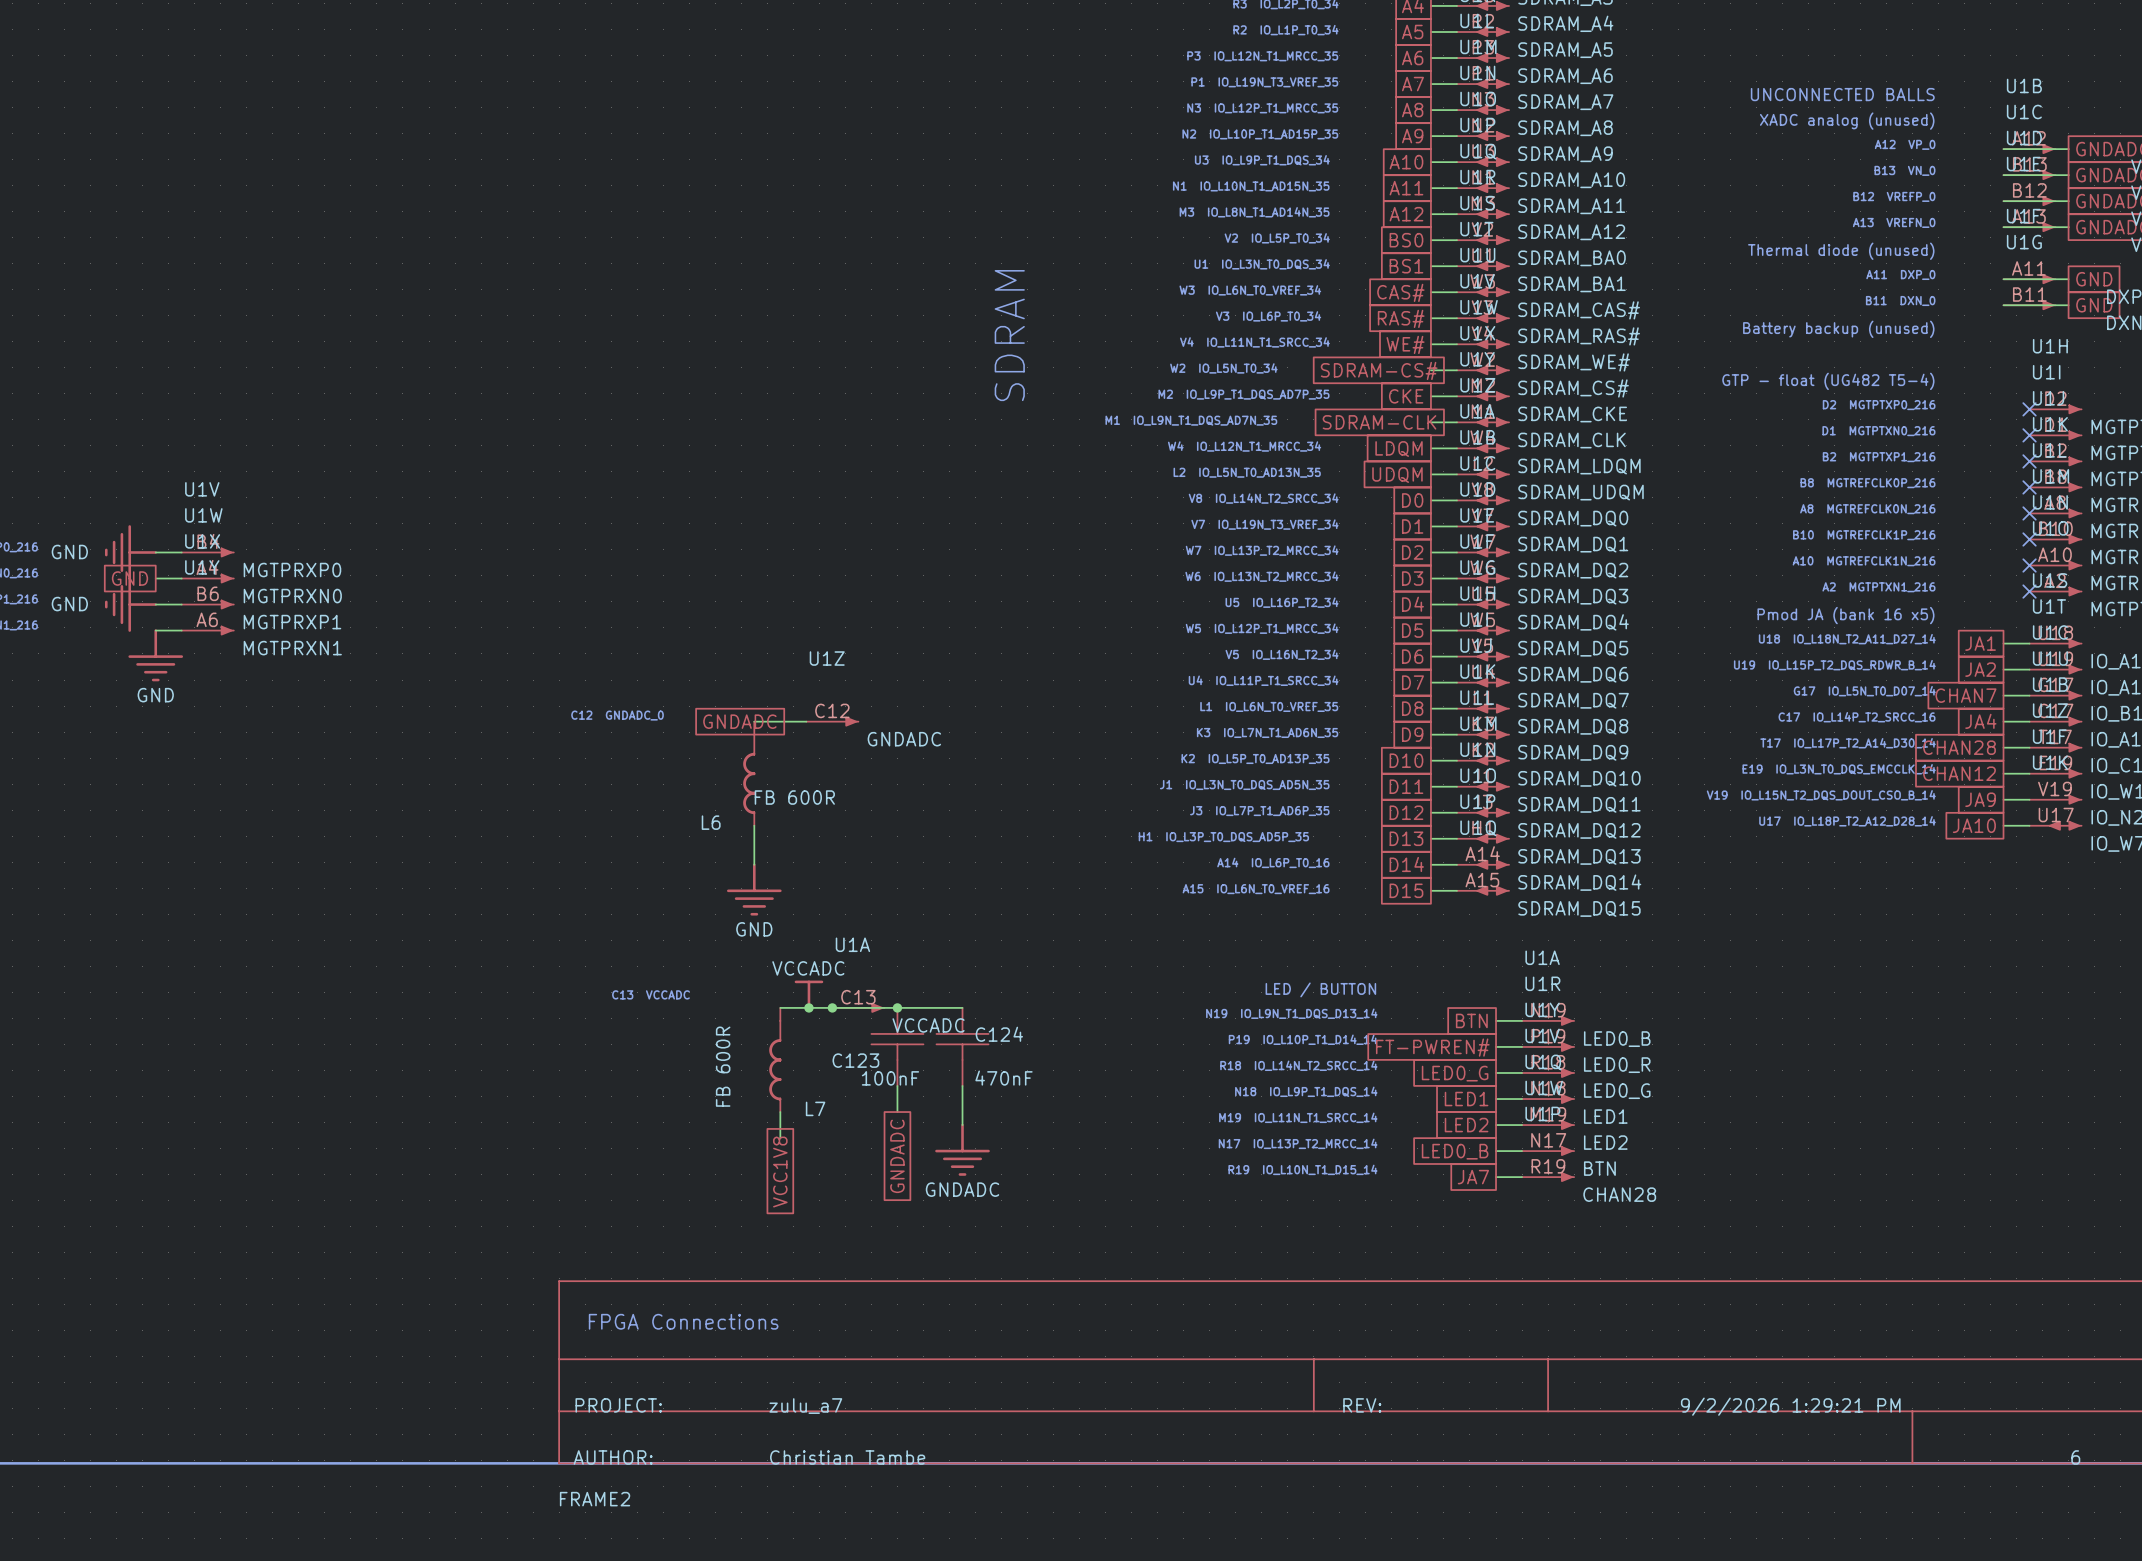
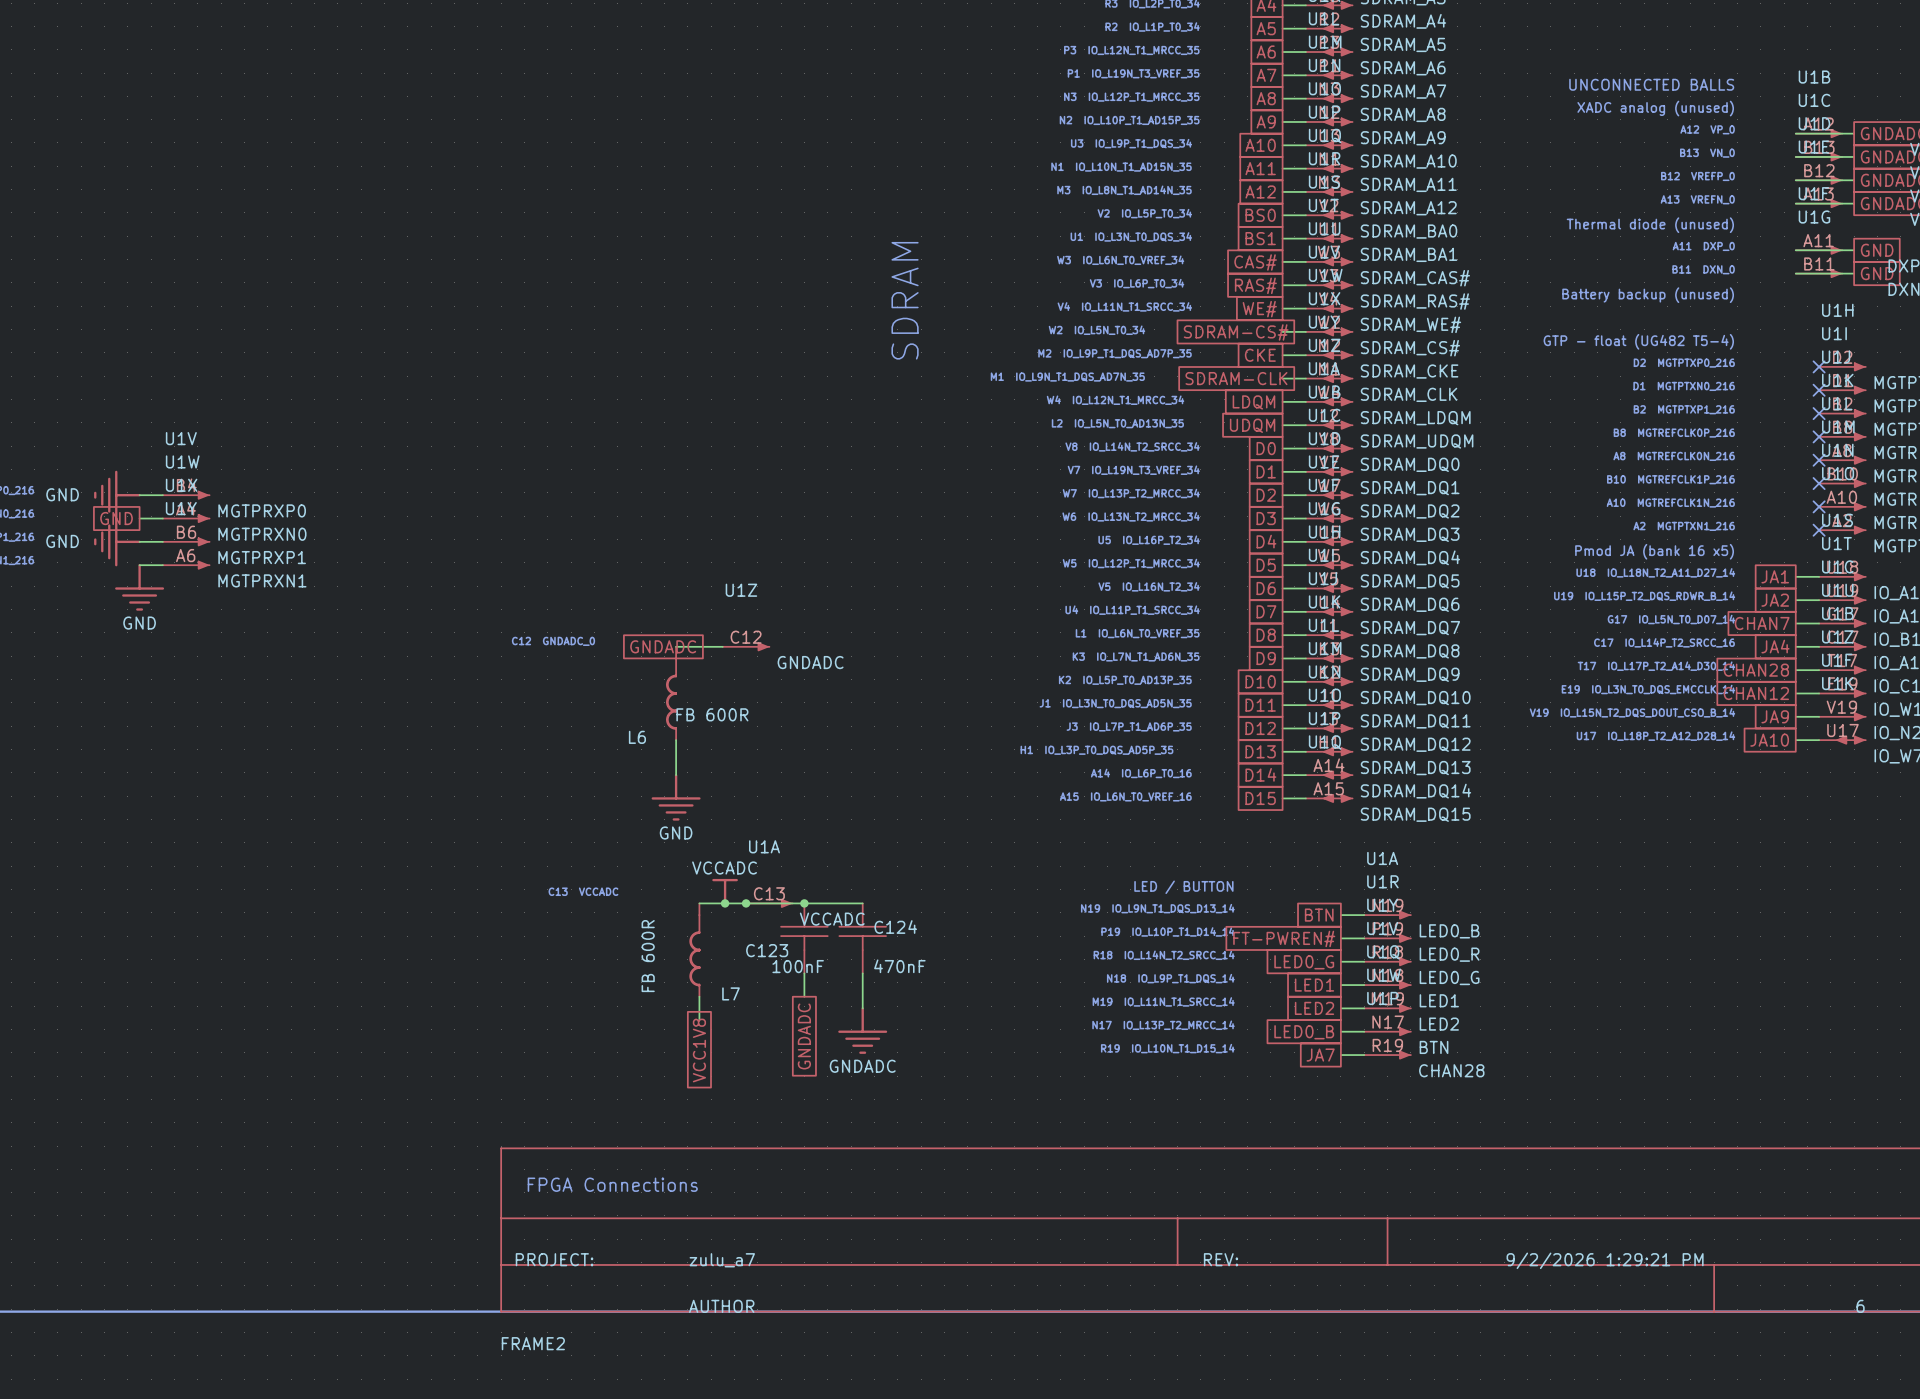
FRAME2 text: AUTHOR: (613, 1457) -> none
FRAME2 text: Christian Tambe (847, 1457) -> AUTHOR (721, 1306)

